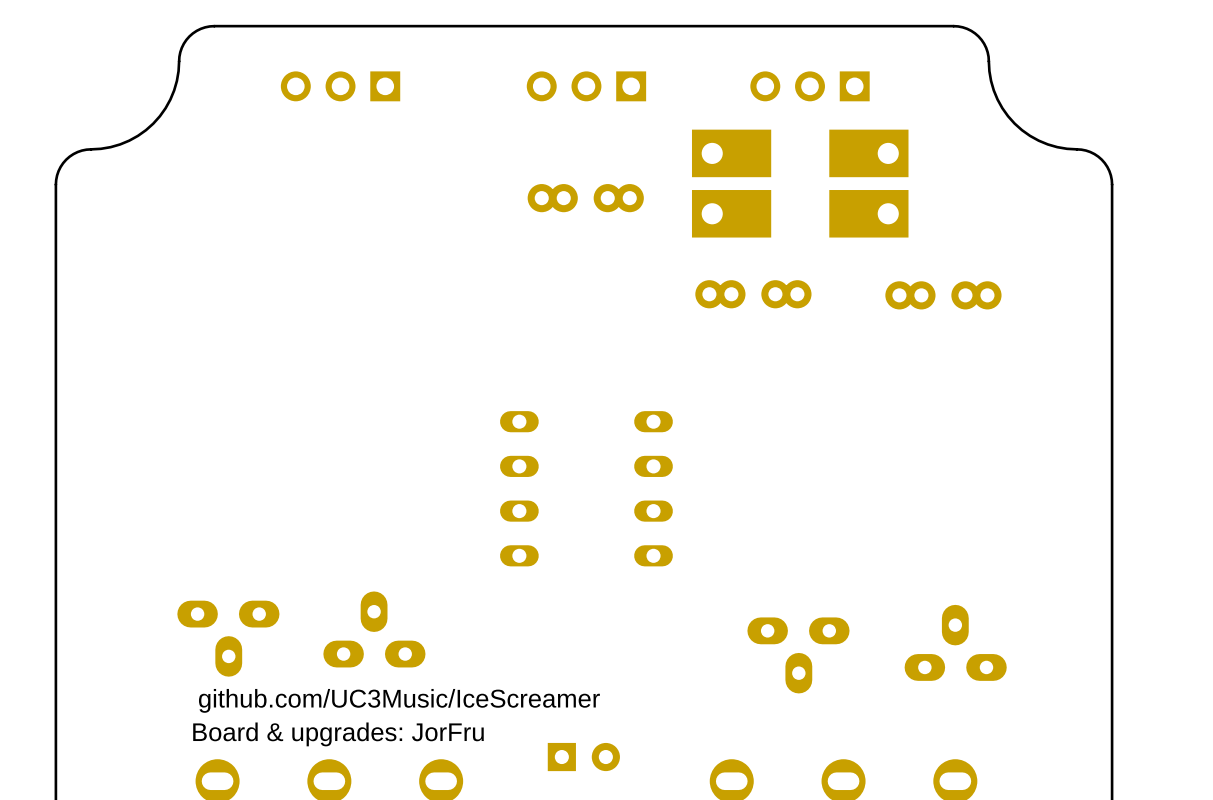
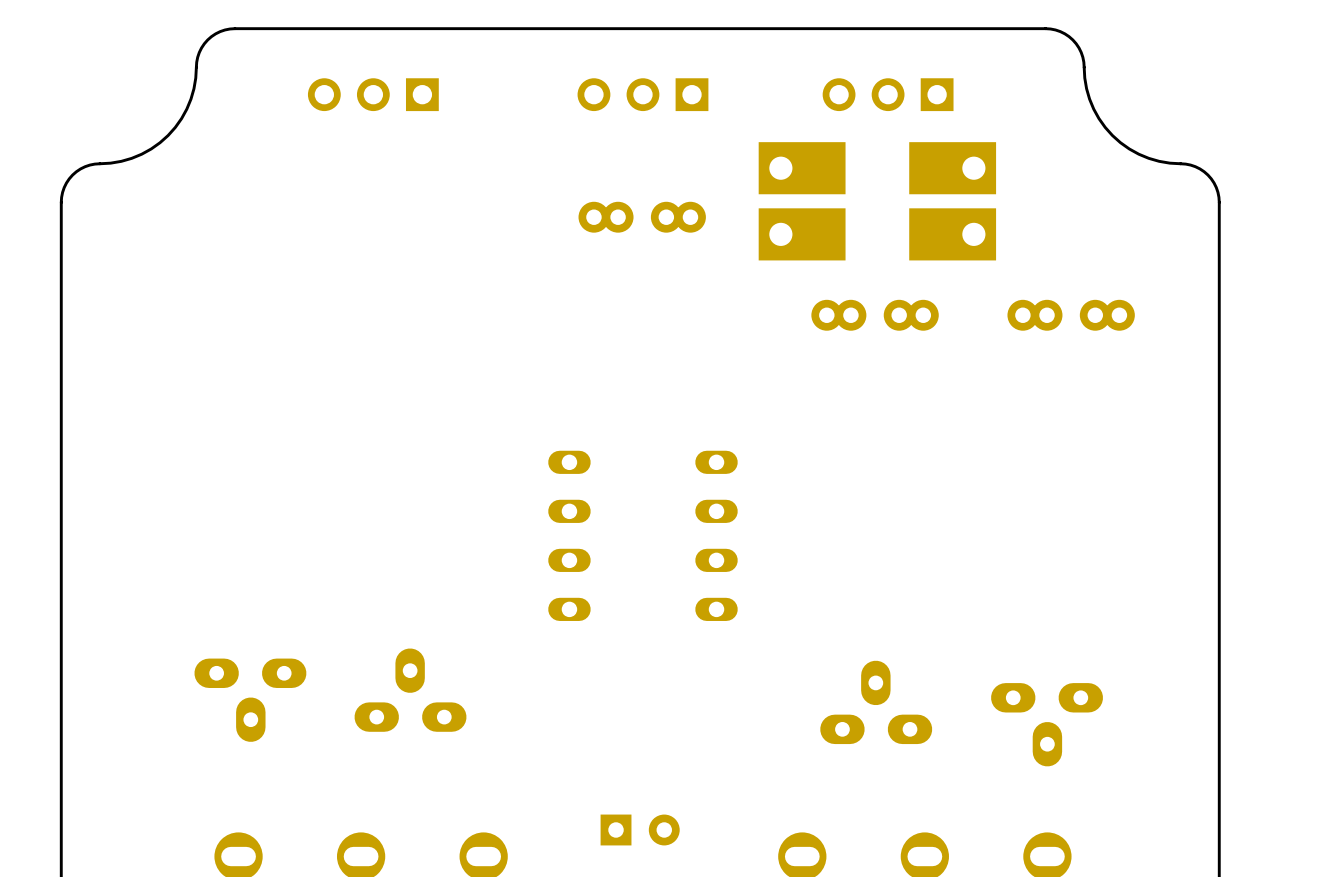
part position: (753, 294) -> (875, 315)
part position: (943, 295) -> (1071, 315)
part rotation: 0° (955, 642) -> 180° (1047, 724)
part rotation: 0° (798, 655) -> 180° (876, 702)
text: github.com/UC3Music/IceScreamer (399, 700) -> none
text: Board & upgrades: JorFru (338, 734) -> none

